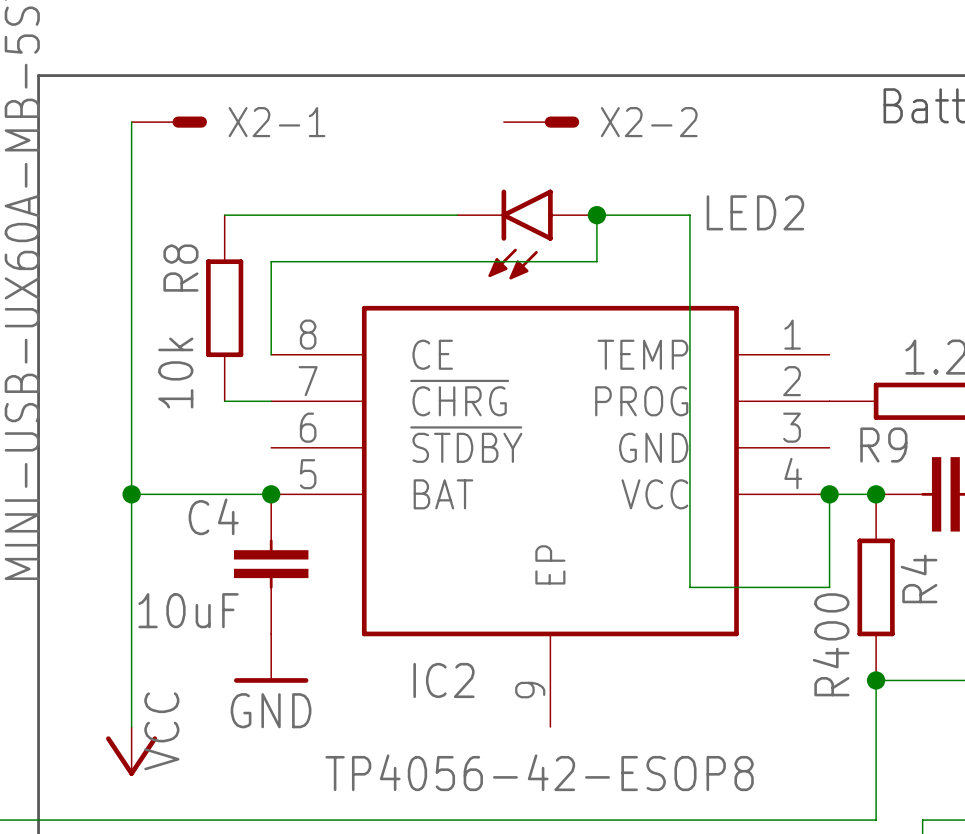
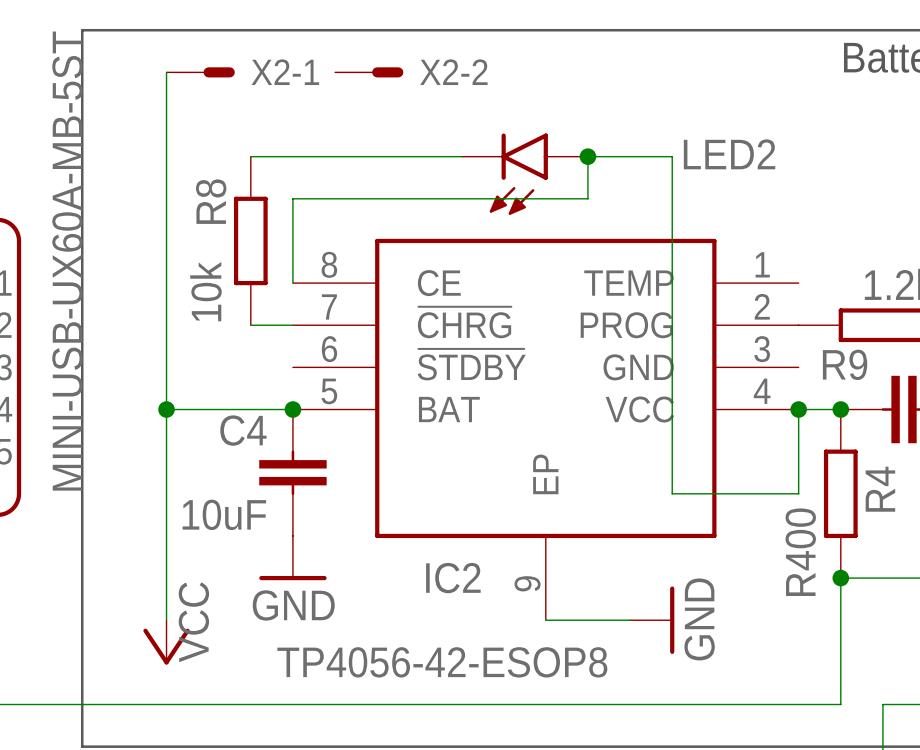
X2-2 position: (541, 122) -> (369, 72)
wire: none -> (545, 620) (630, 620)
power symbol: none -> GND (652, 620)
IC2 value position: TP4056-42-ESOP8 (539, 772) -> TP4056-42-ESOP8 (442, 662)

